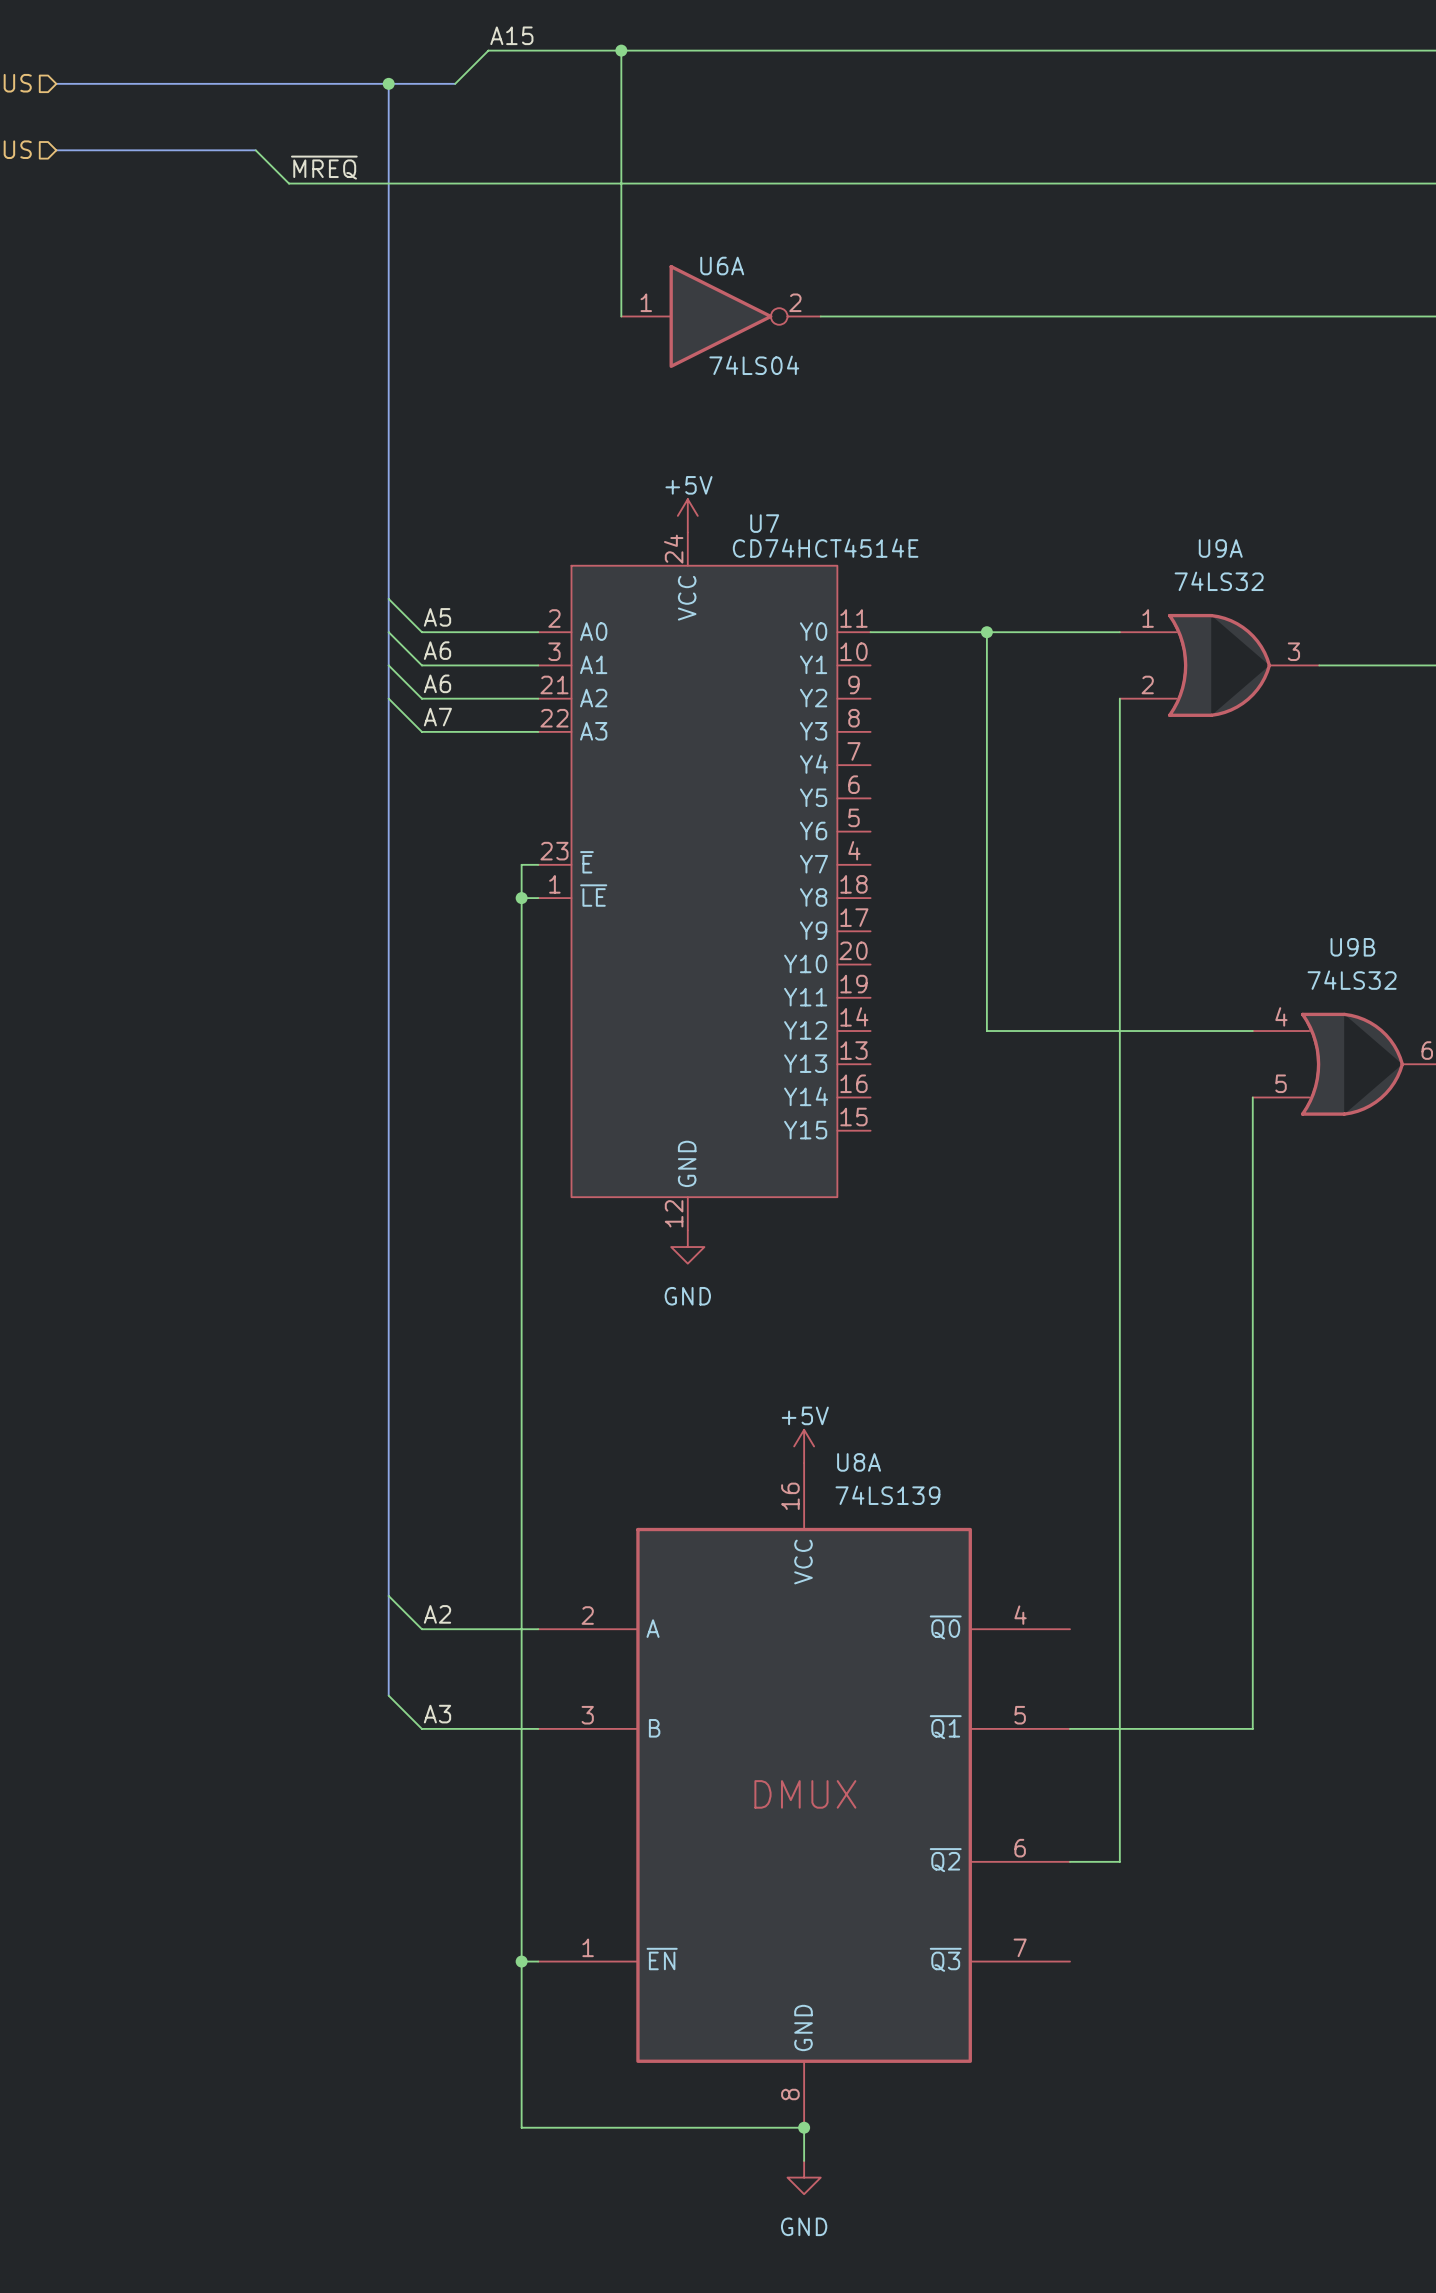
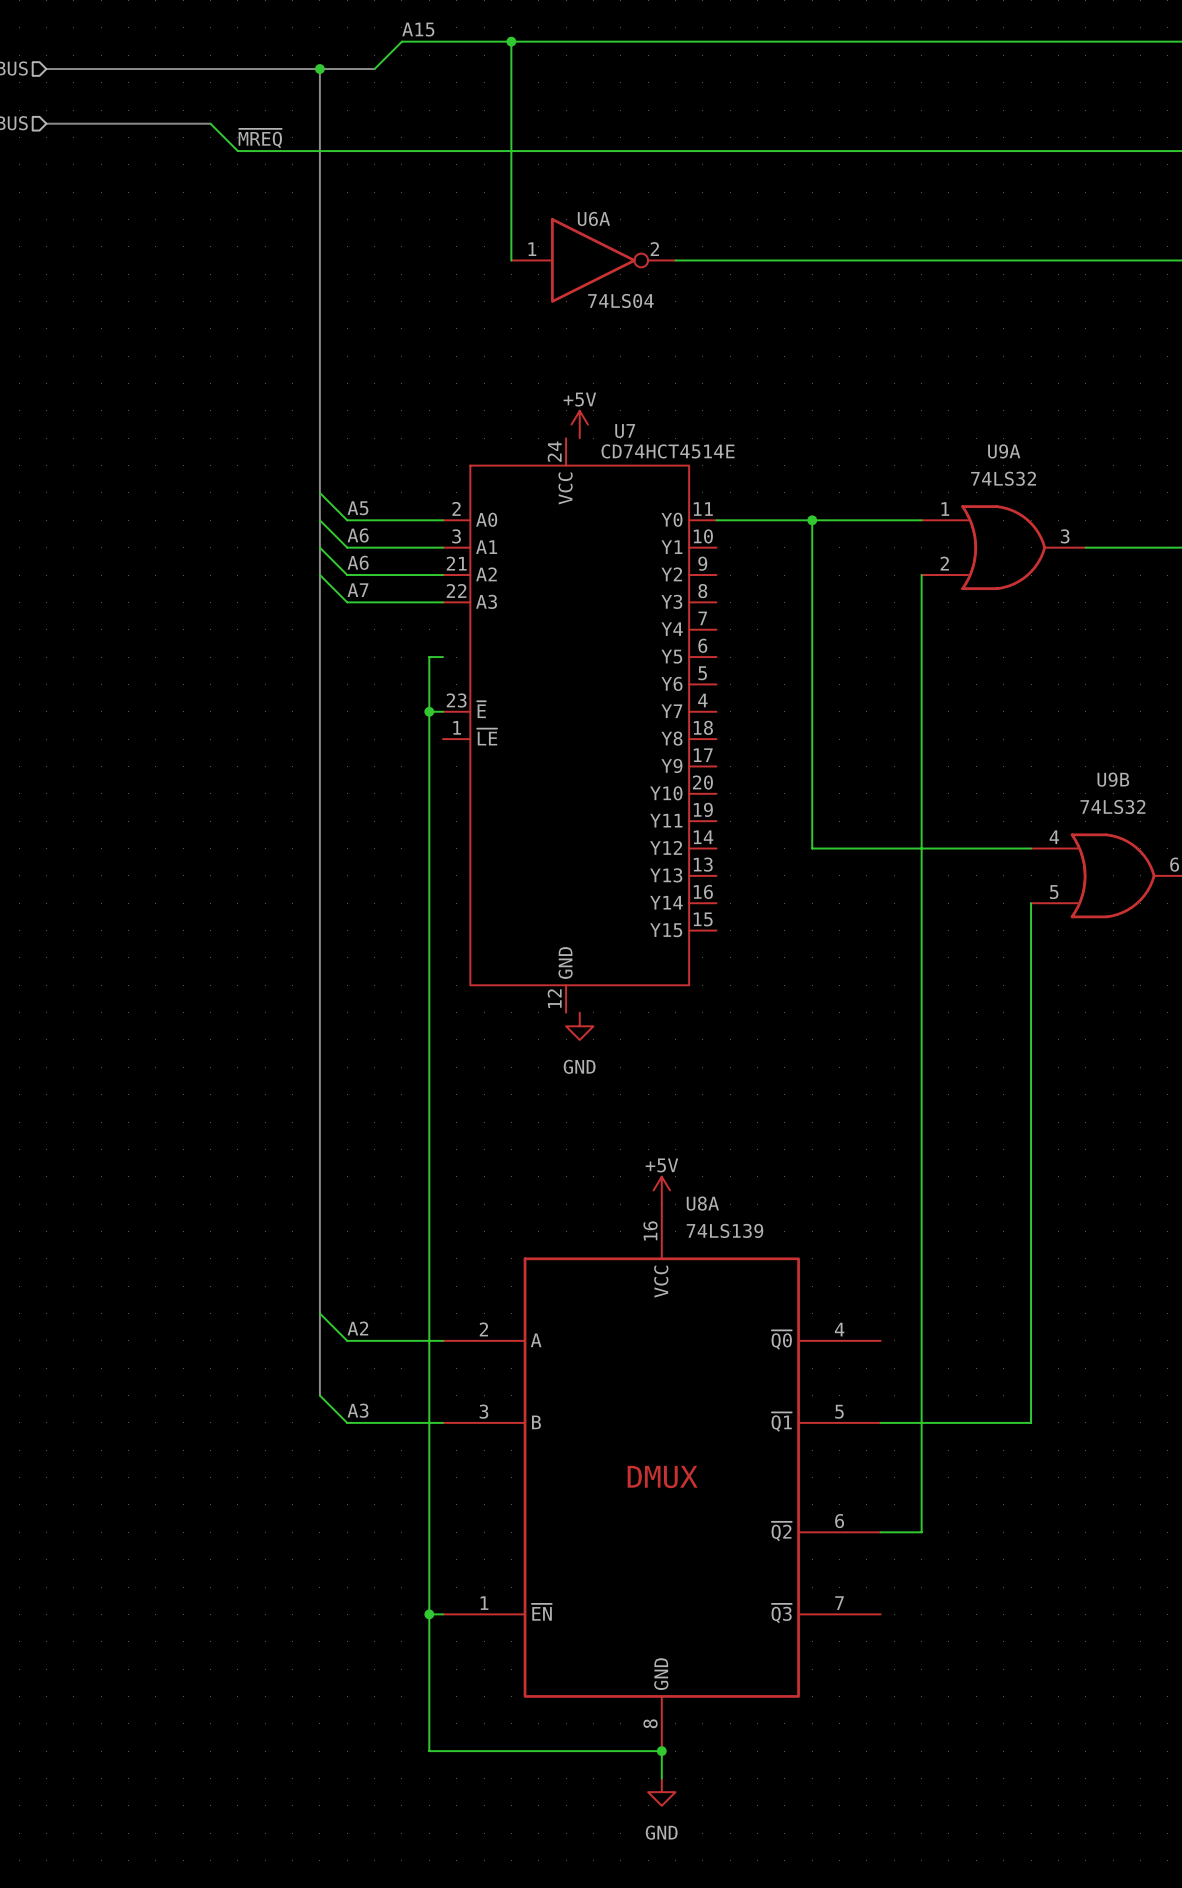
power symbol position: +5V (687, 515) -> +5V (579, 424)
wire: none -> (442, 657) (429, 657) (429, 711)
wire: (521, 898) (538, 898) -> none
junction position: (521, 898) -> (429, 711)
power symbol position: GND (687, 1247) -> GND (579, 1026)

